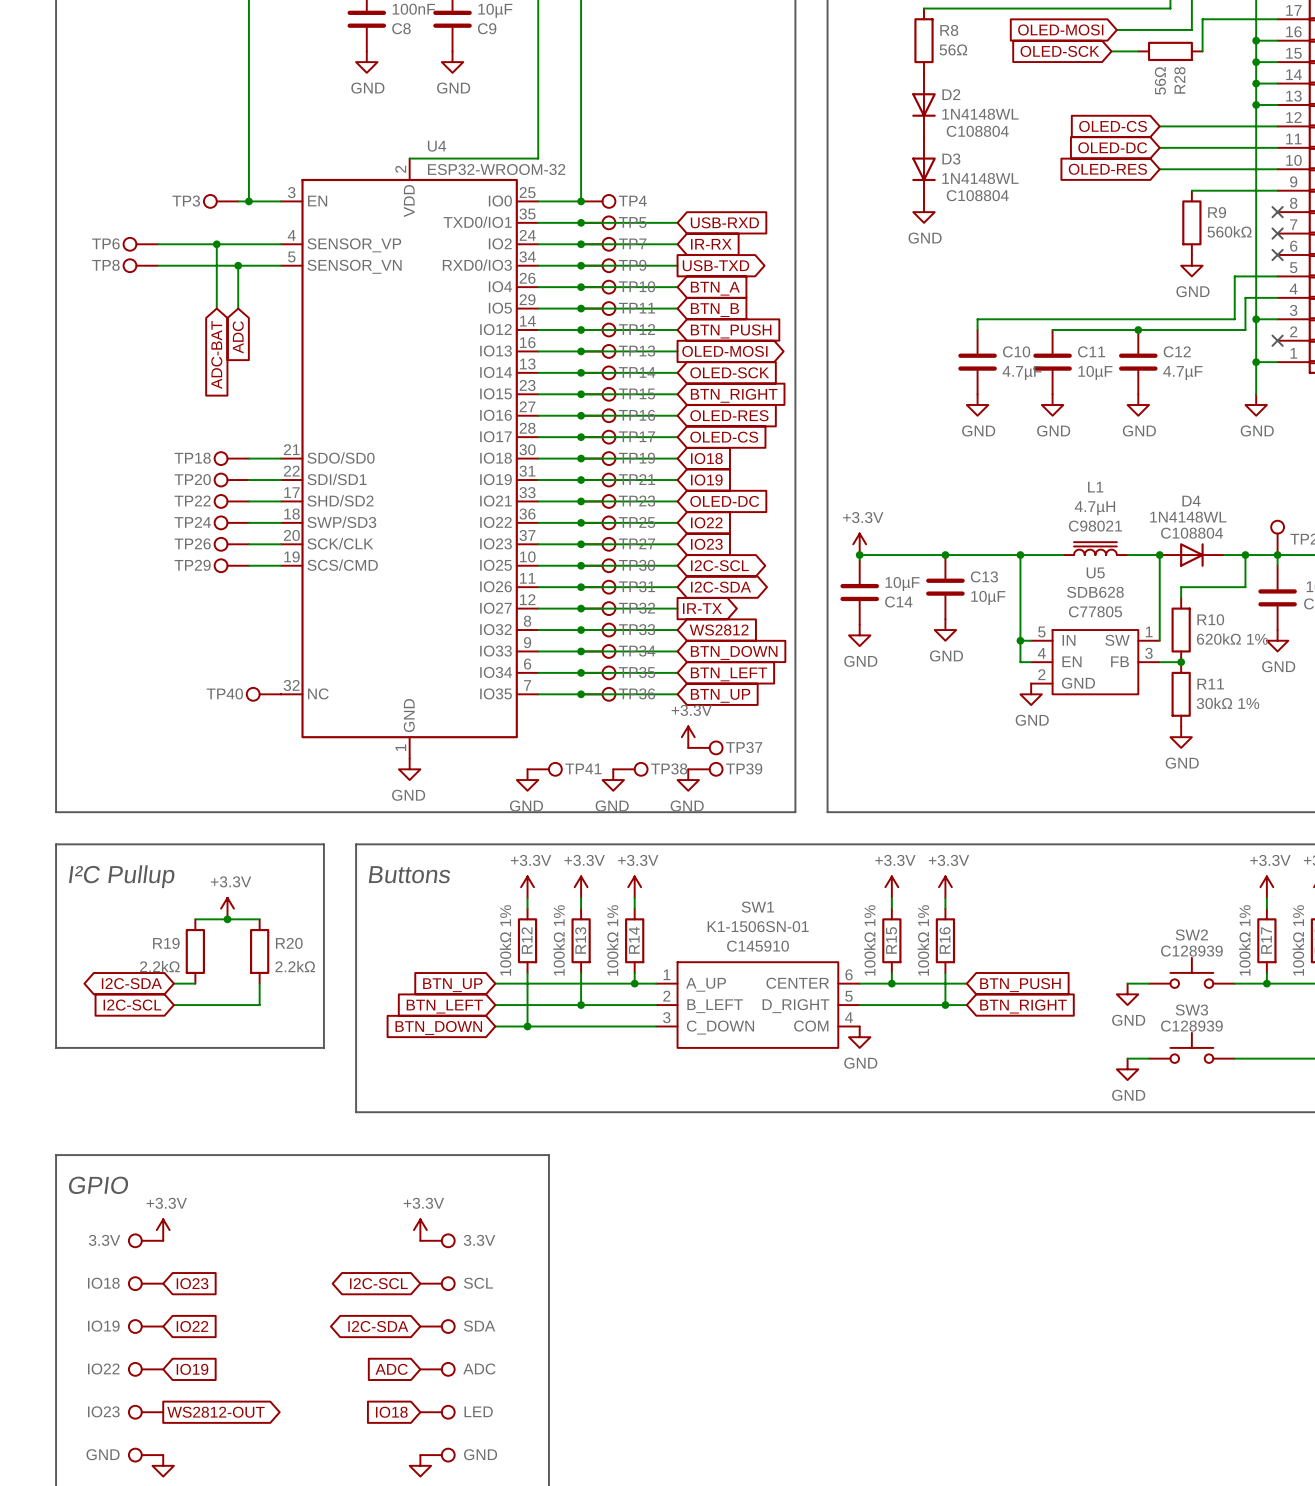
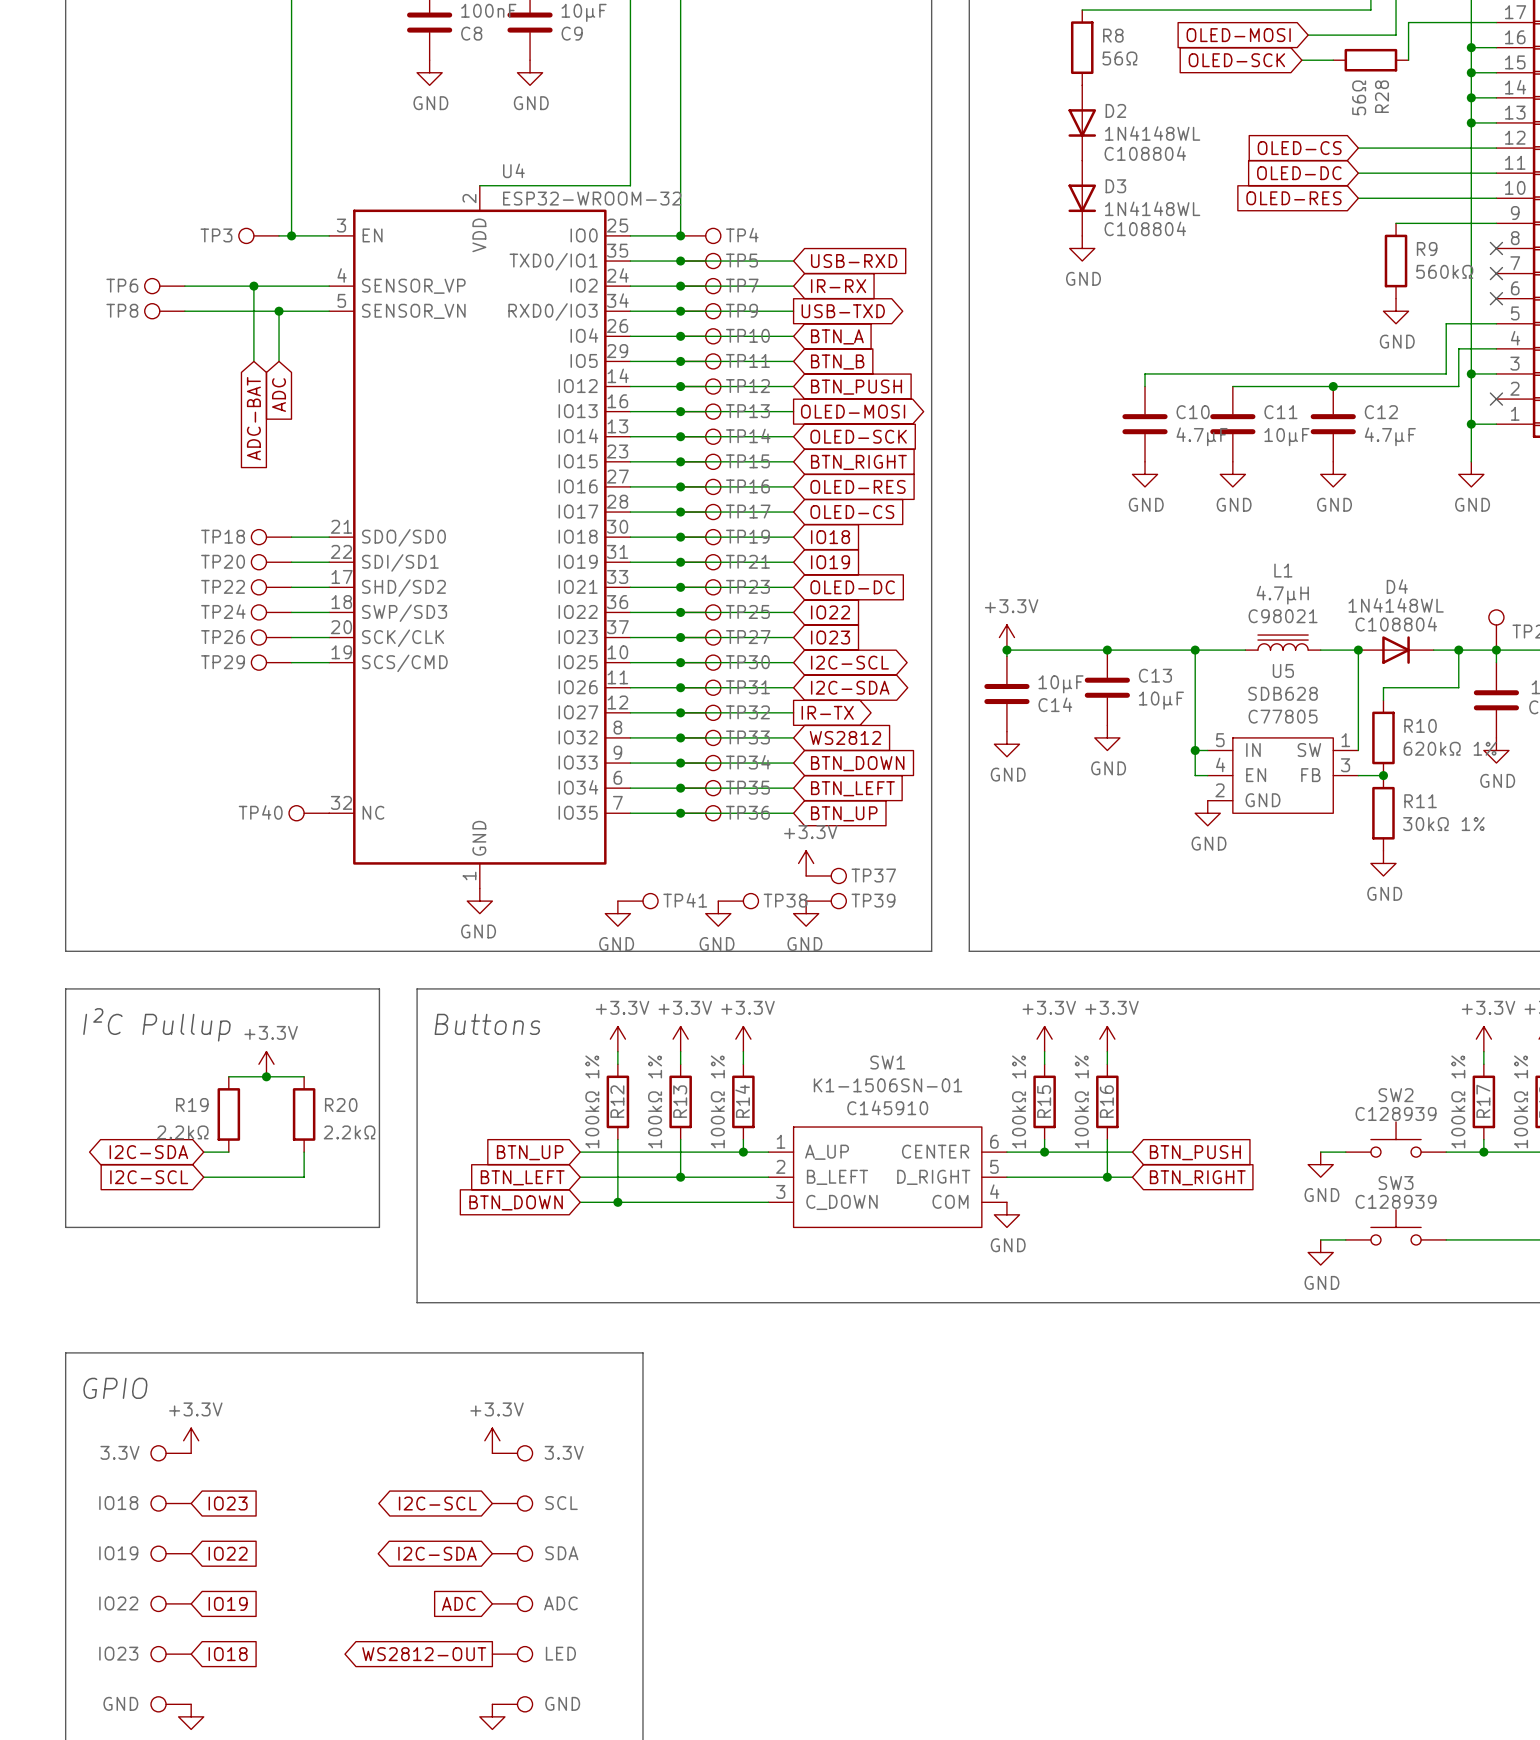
global label shape: output (215, 1412) -> input (228, 1654)
global label: WS2812-OUT (215, 1412) -> IO18 (228, 1654)
global label shape: input (391, 1412) -> output (424, 1654)
global label: IO18 (391, 1412) -> WS2812-OUT (424, 1654)

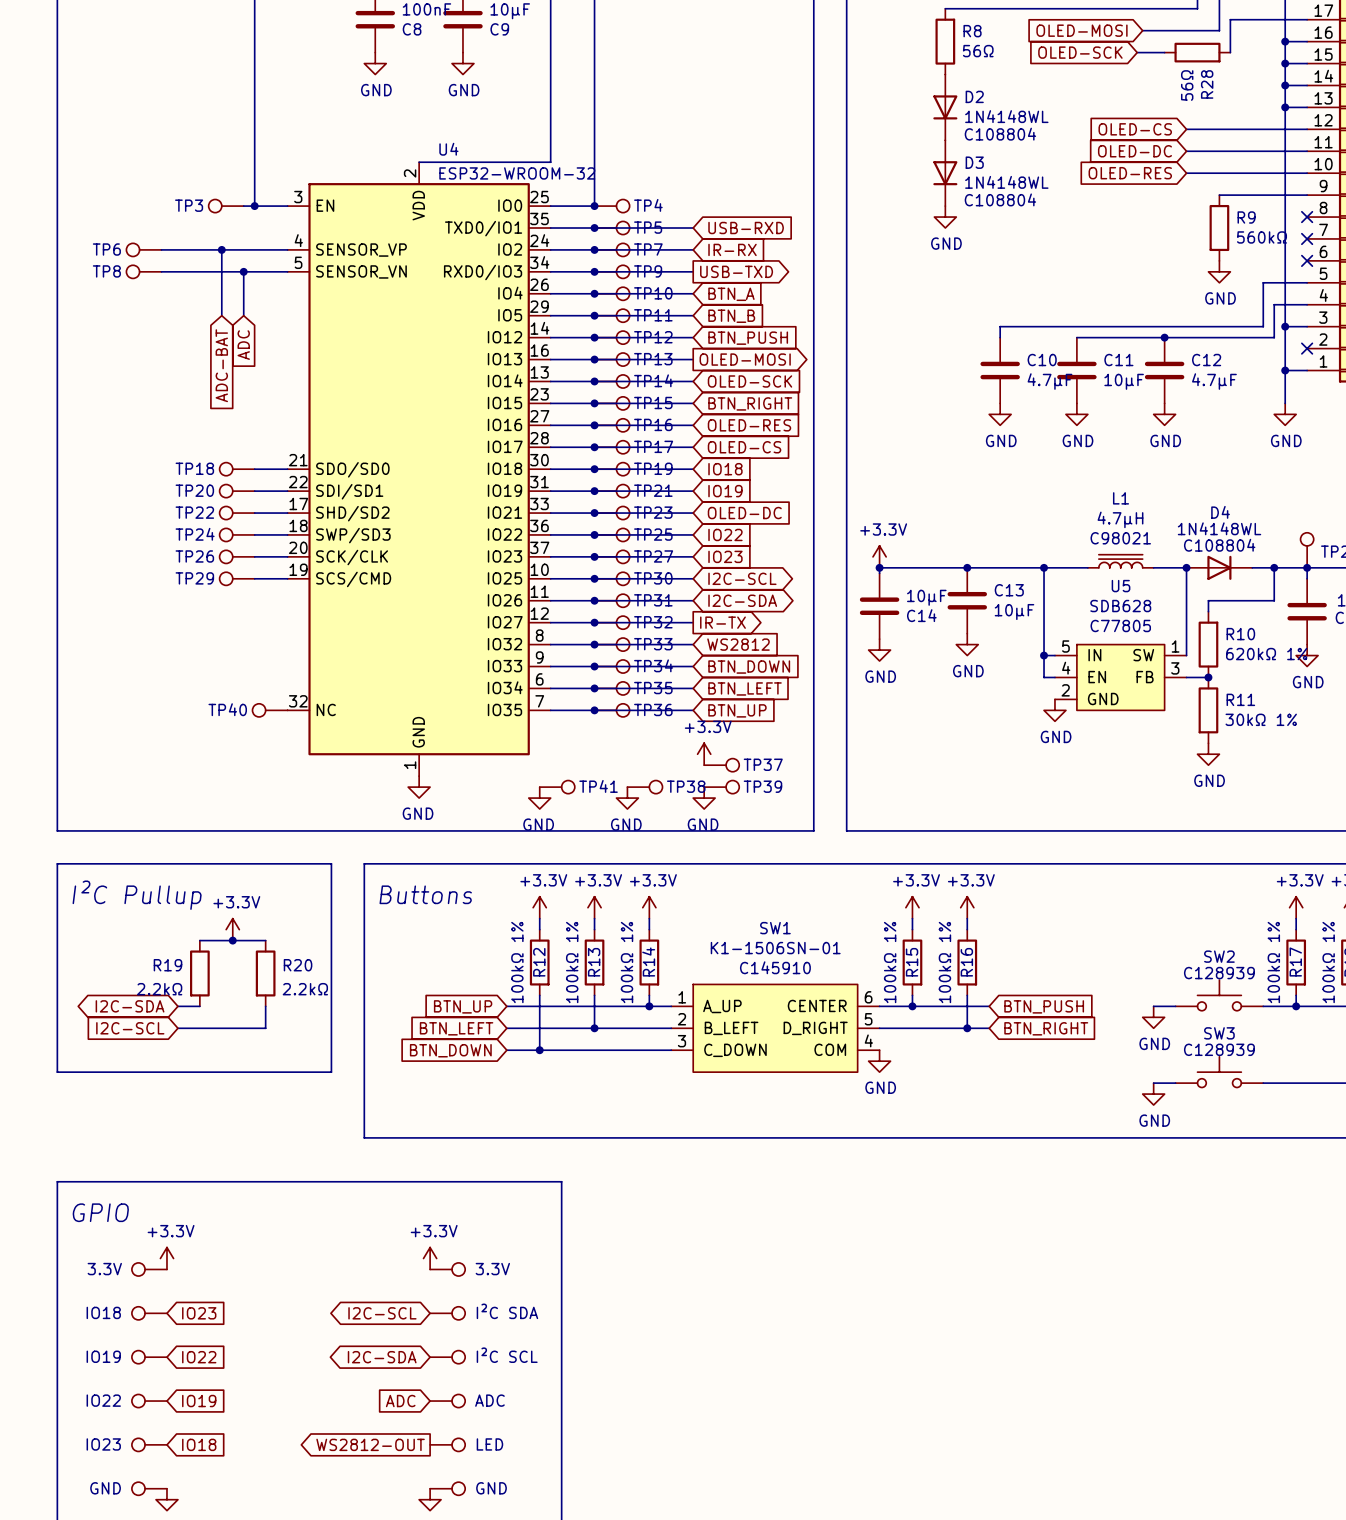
part value: SCL (561, 1503) -> I²C SDA (507, 1311)
part value: SDA (561, 1553) -> I²C SCL (507, 1355)

